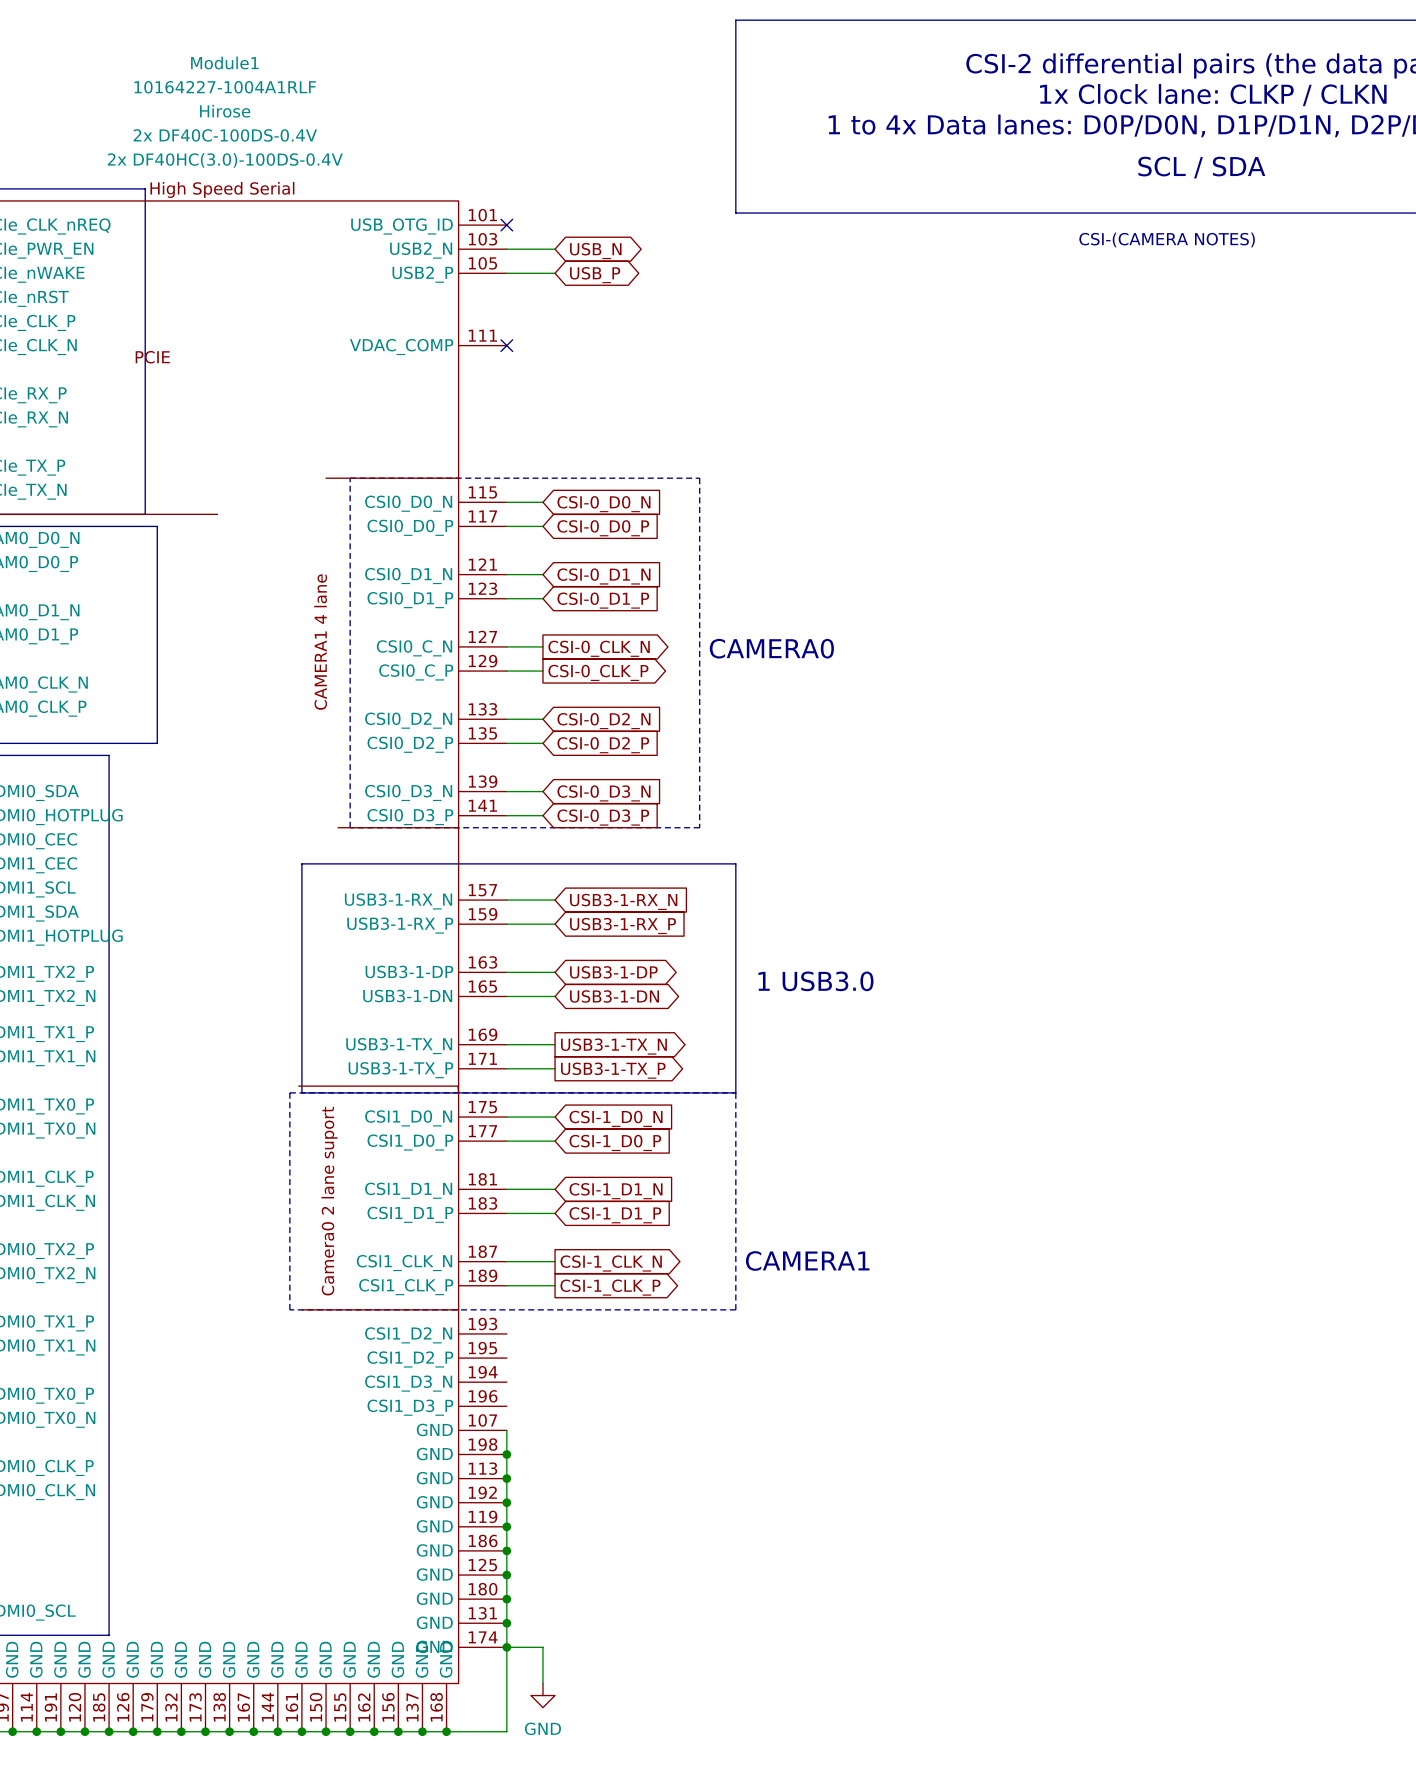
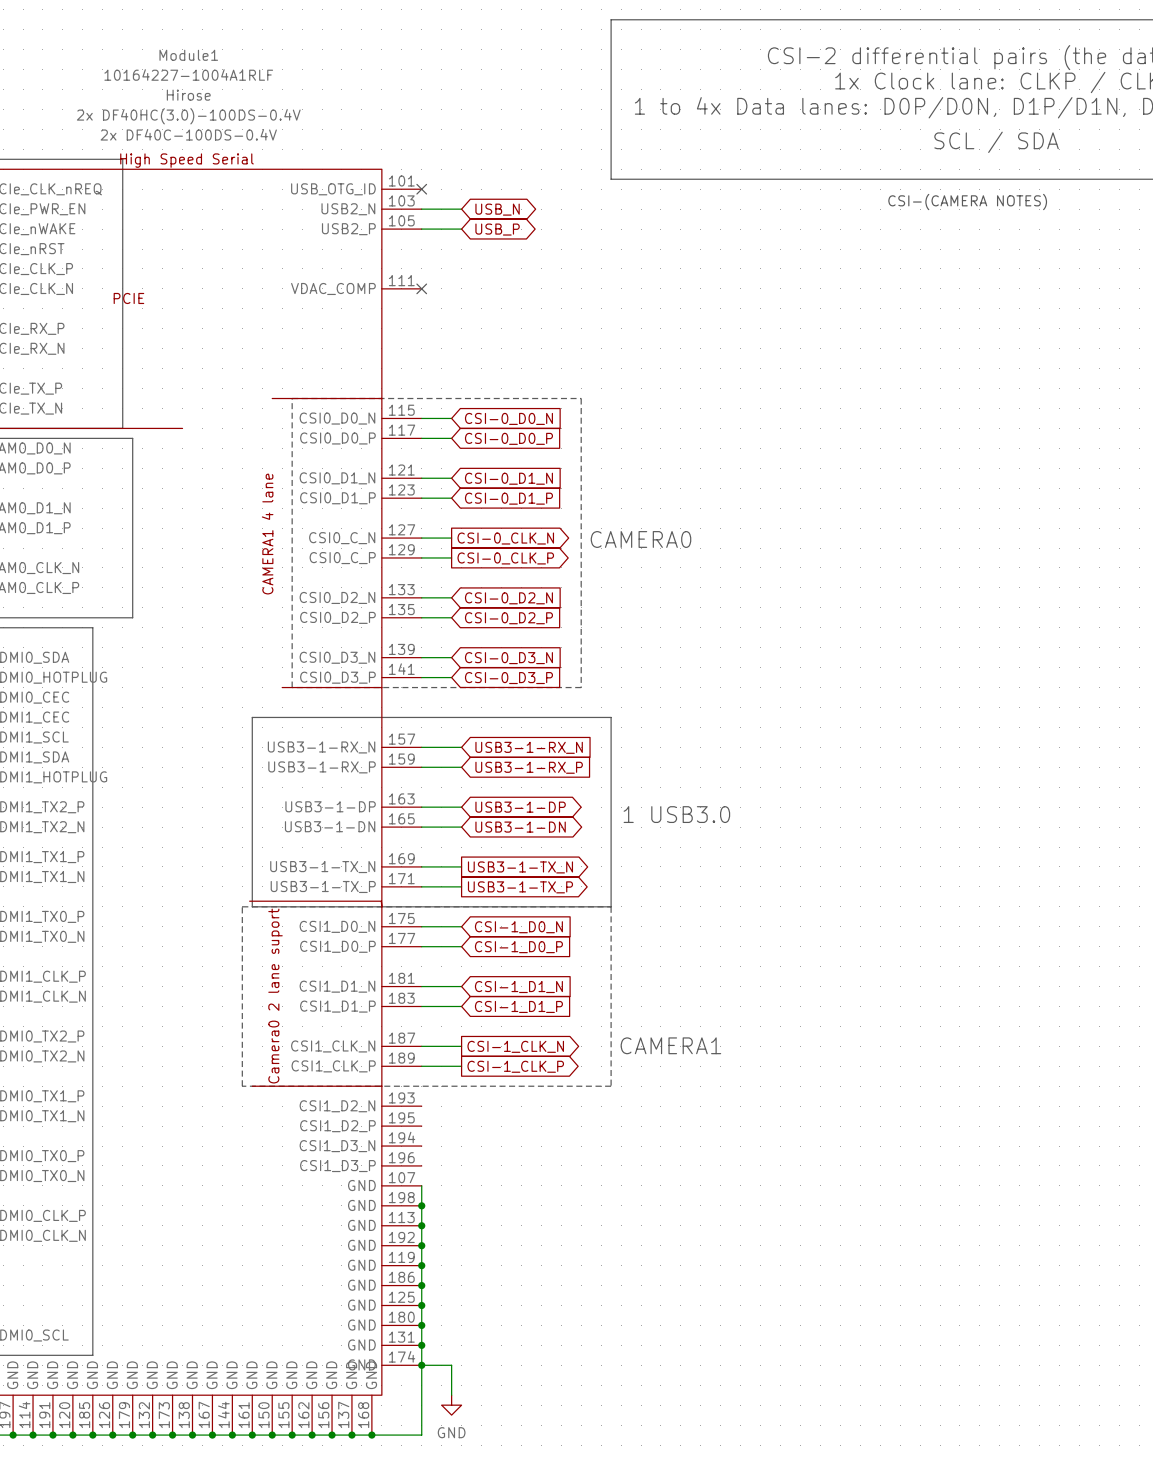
Module1 text: 2x DF40C-100DS-0.4V (225, 135) -> 2x DF40HC(3.0)-100DS-0.4V (188, 116)
Module1 text: 2x DF40HC(3.0)-100DS-0.4V (225, 160) -> 2x DF40C-100DS-0.4V (188, 134)

